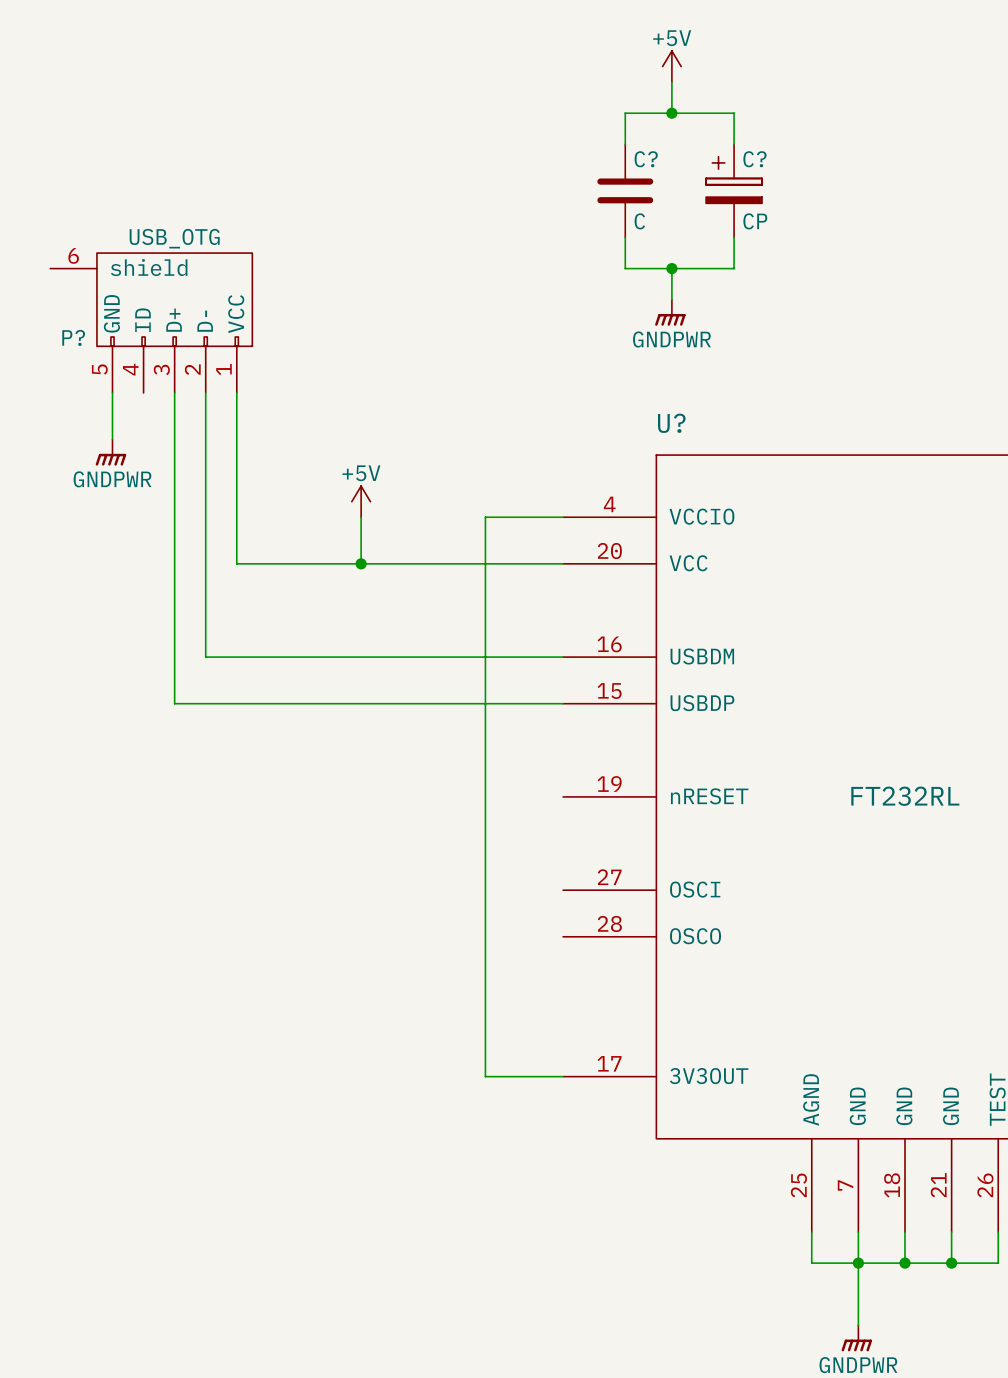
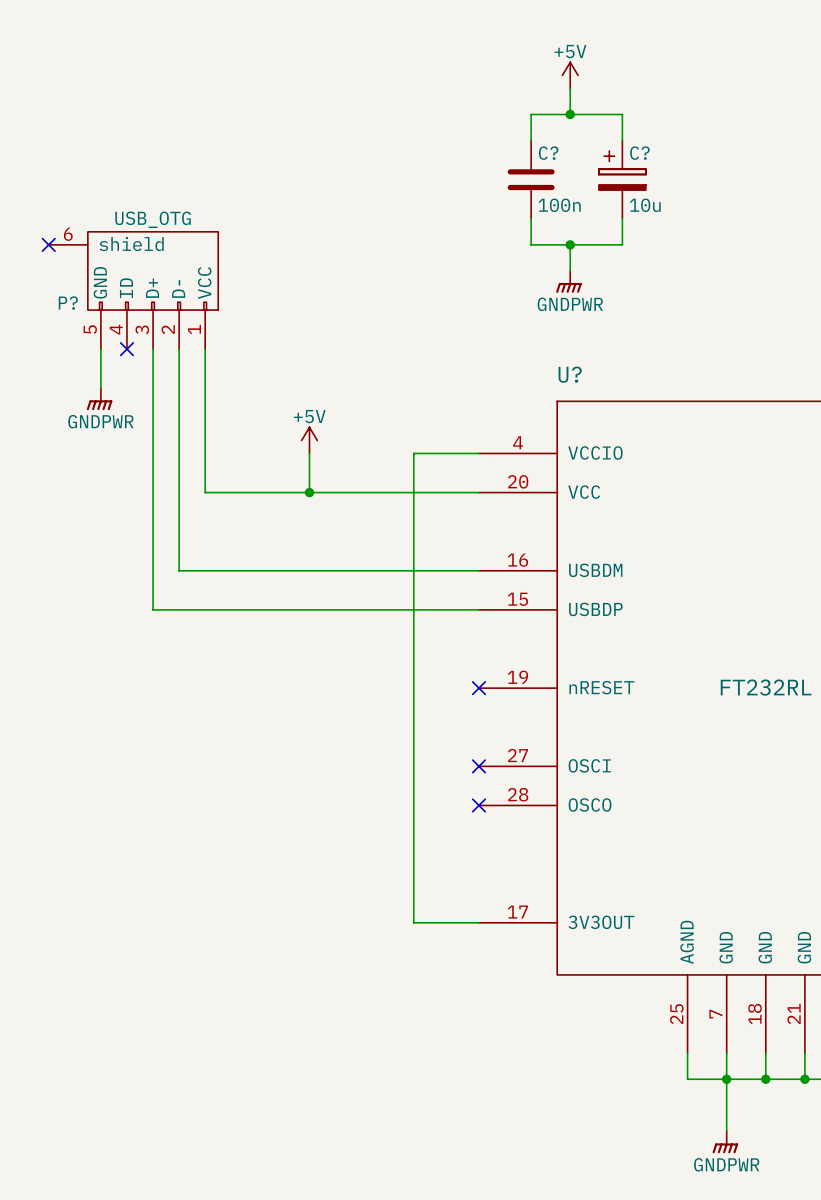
C? value: C (639, 221) -> 100n (559, 205)
C? value: CP (755, 221) -> 10u (645, 205)
no-connect mark: none -> (48, 244)
no-connect mark: none -> (126, 349)
no-connect mark: none -> (478, 688)
no-connect mark: none -> (478, 766)
no-connect mark: none -> (478, 805)

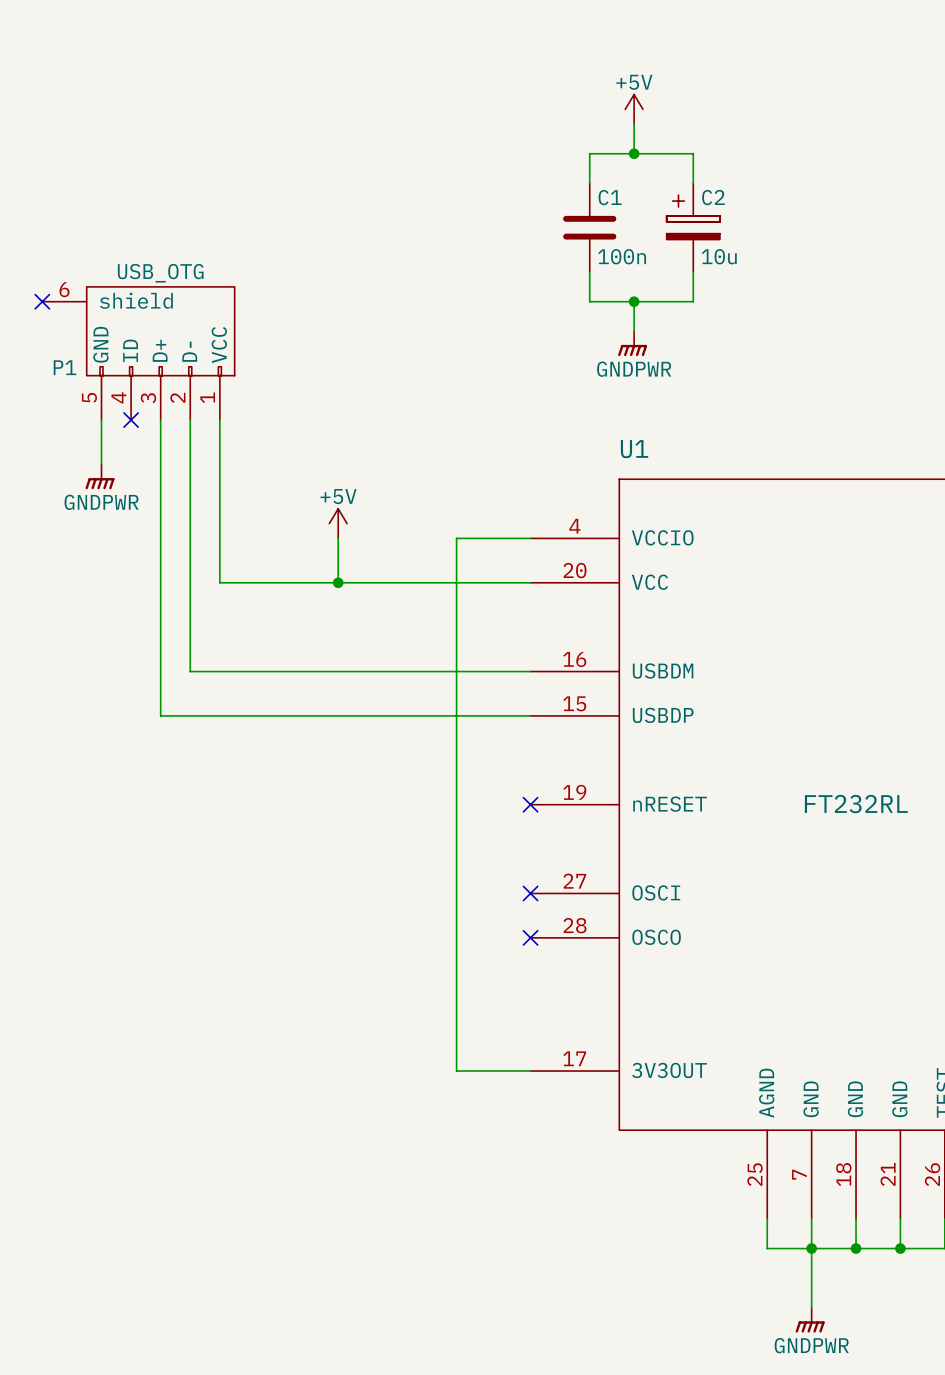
C? name: C? (548, 153) -> C1 (610, 197)
C? name: C? (639, 153) -> C2 (713, 197)
P? name: P? (68, 303) -> P1 (64, 367)
U? name: U? (570, 374) -> U1 (634, 449)

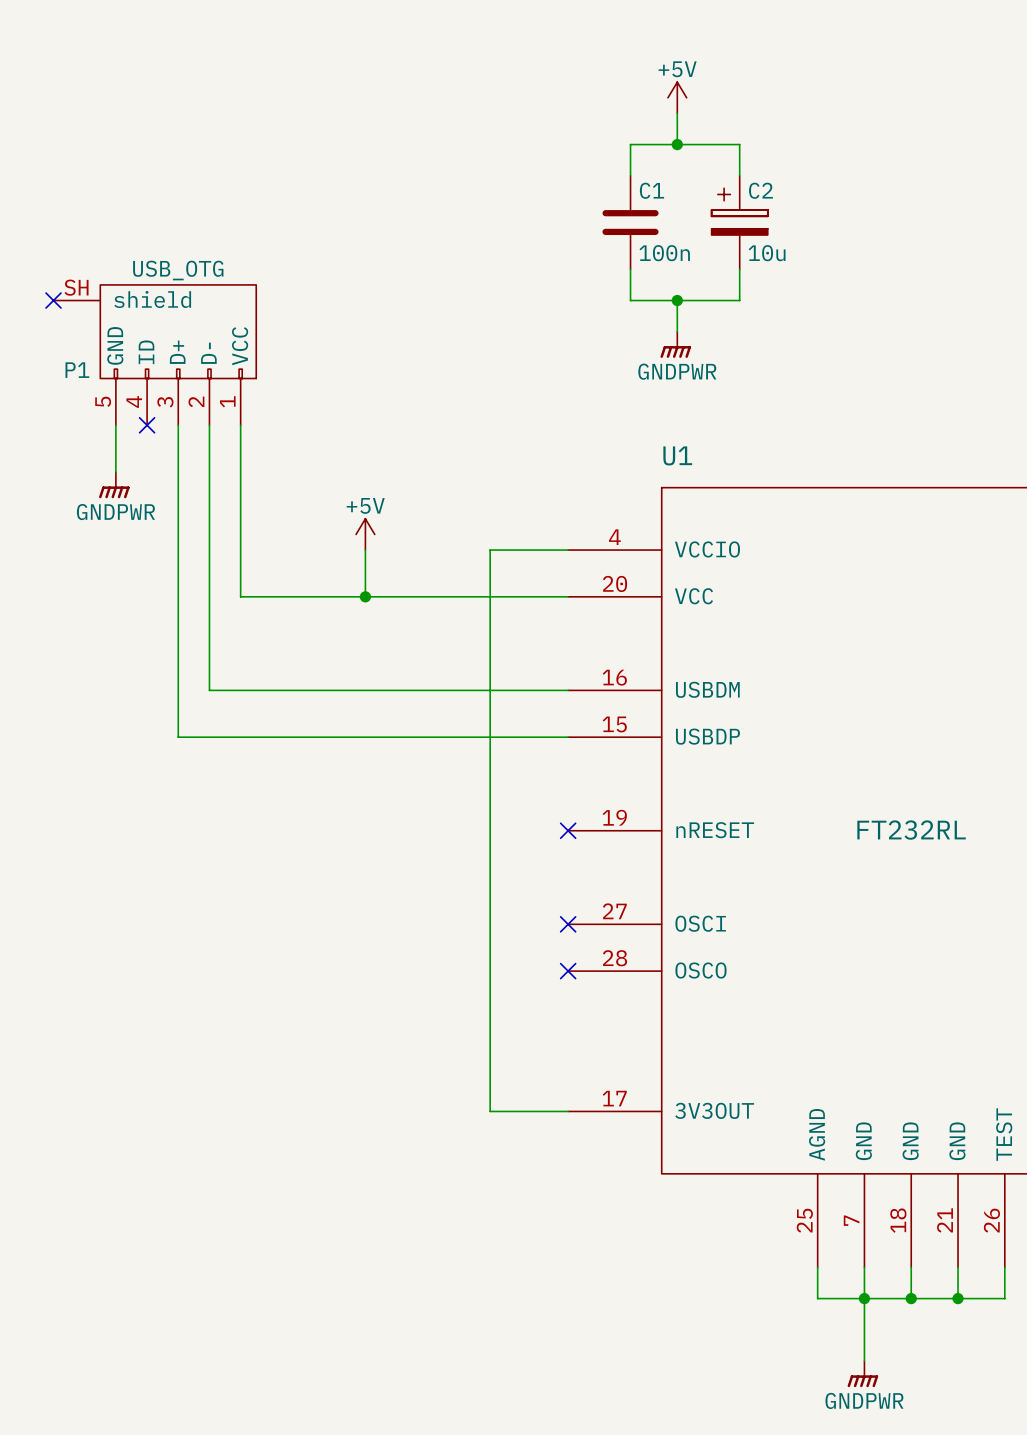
P1 pin number: 6 (64, 289) -> SH (76, 287)

